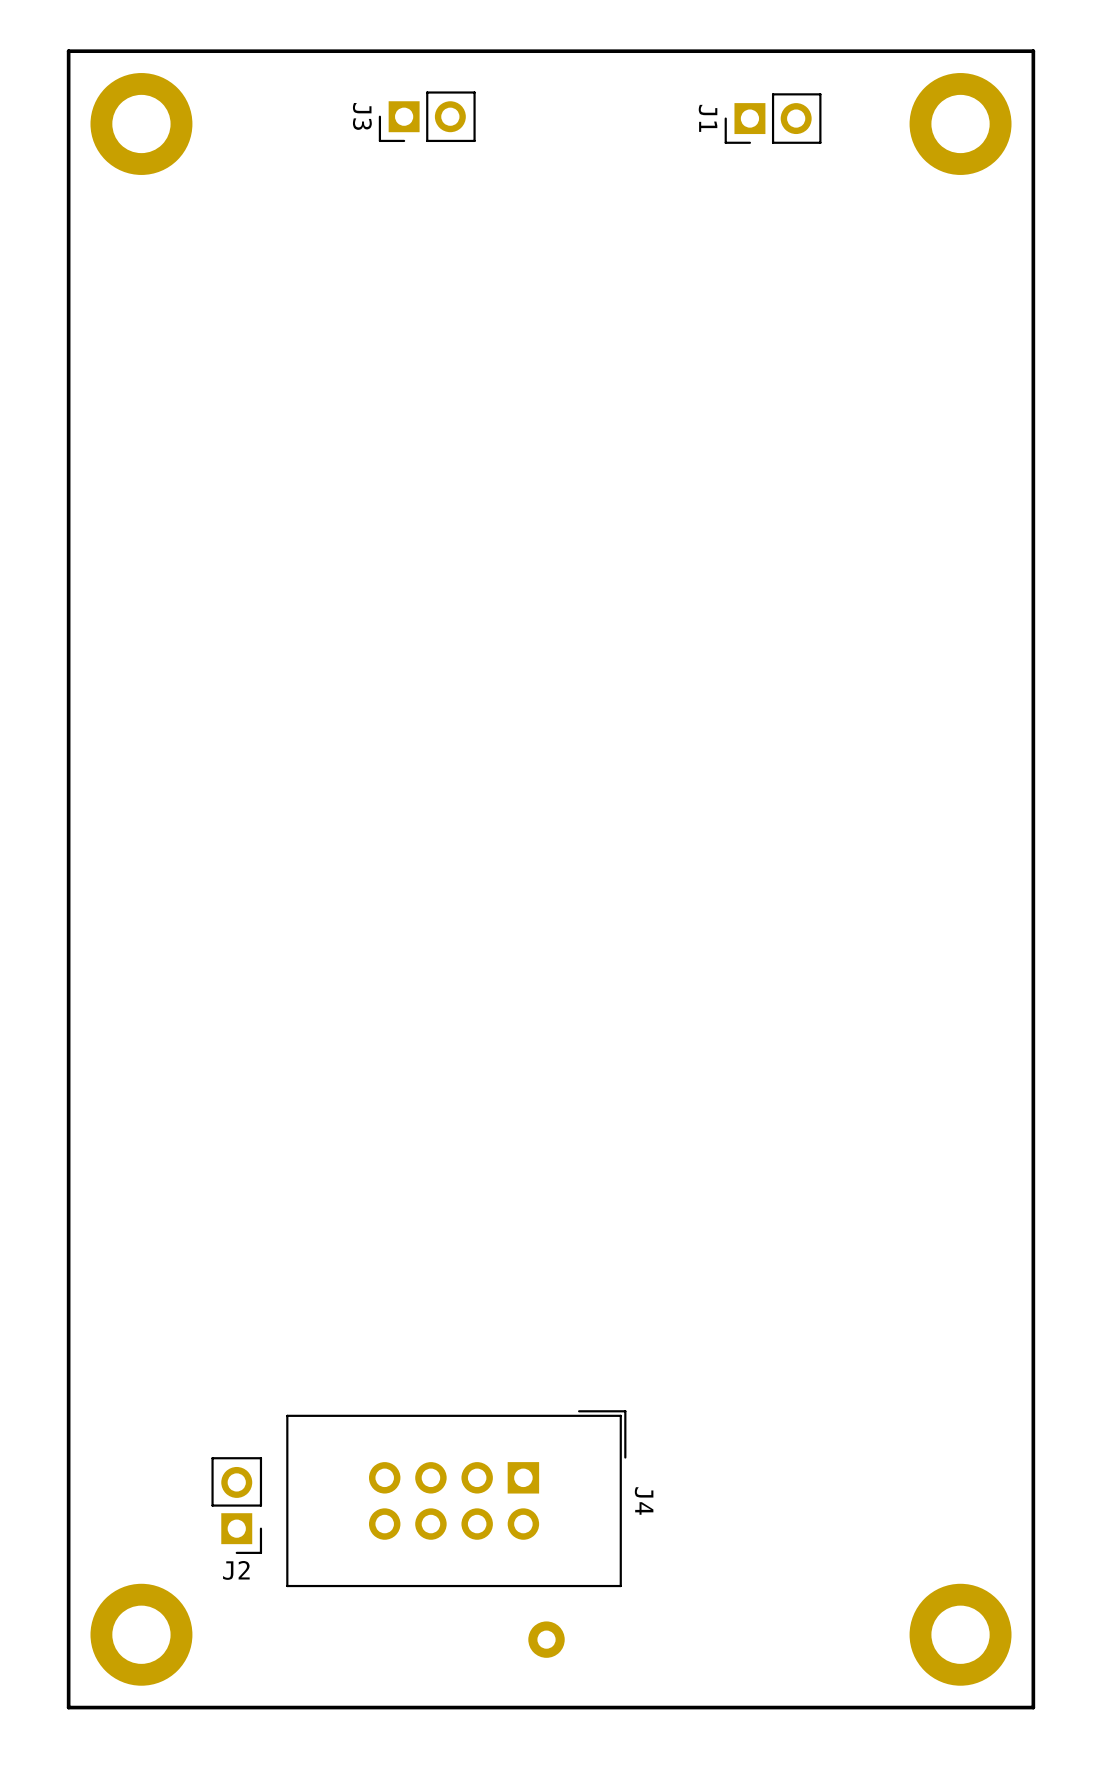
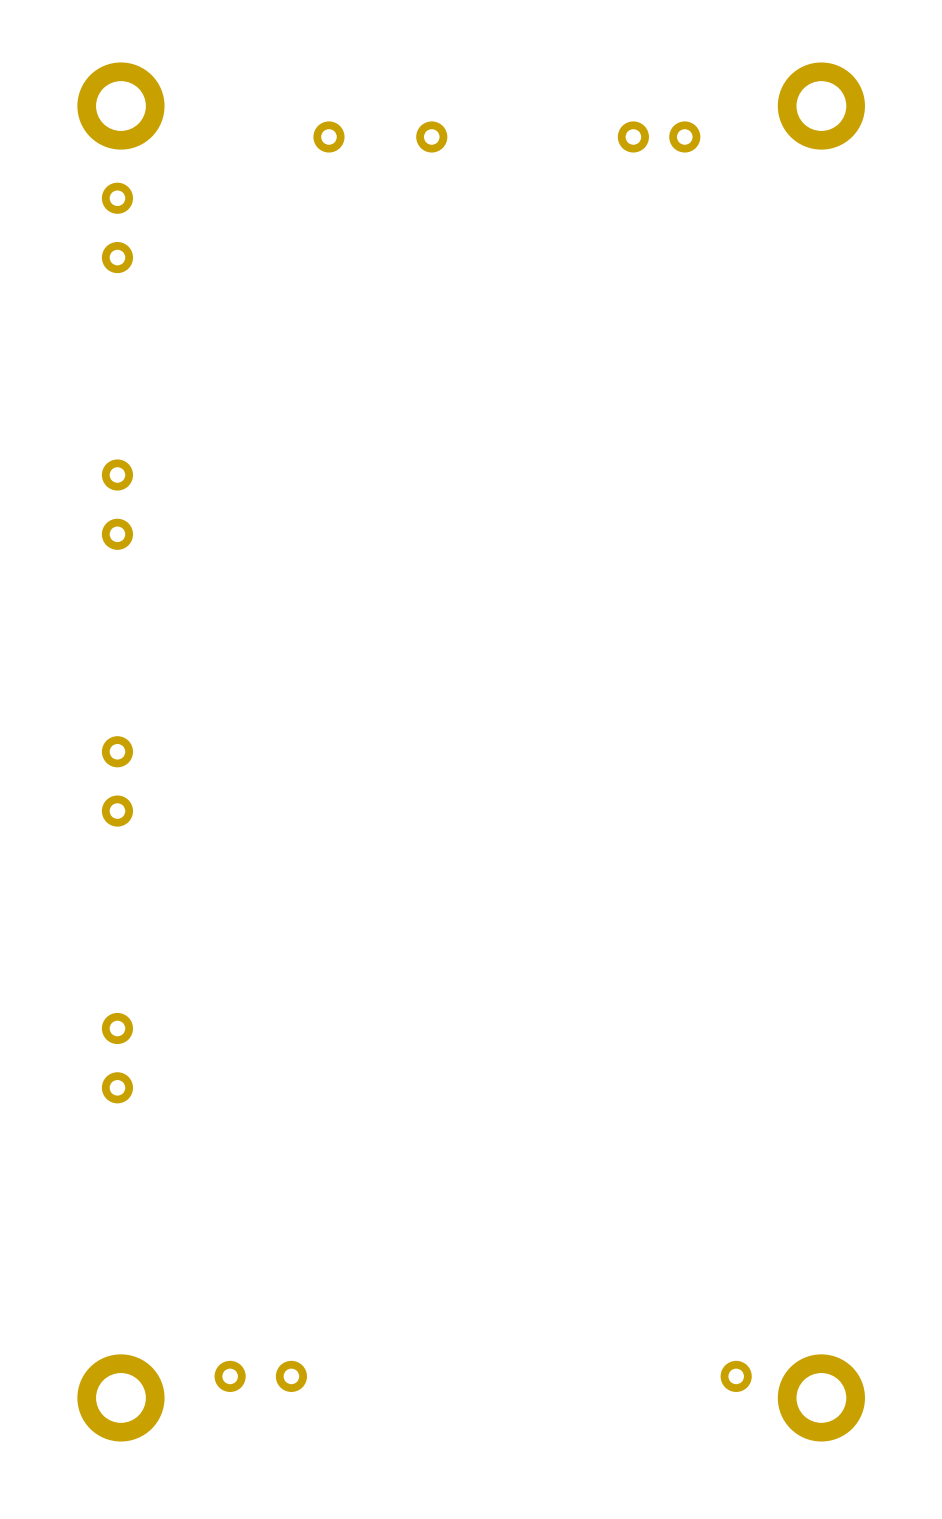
board edge: (1033, 51) (1033, 1707) (68, 1707) (68, 51) (1033, 51) -> none
J3: (427, 116) -> none
J1: (773, 118) -> none
part: none -> (328, 136)
part: none -> (431, 136)
part: none -> (633, 136)
part: none -> (684, 136)
part: none -> (117, 198)
part: none -> (117, 257)
part: none -> (117, 475)
part: none -> (117, 534)
part: none -> (117, 751)
part: none -> (117, 811)
part: none -> (117, 1028)
part: none -> (117, 1087)
J4: (456, 1498) -> none
J2: (236, 1505) -> none
part: none -> (230, 1376)
part: none -> (291, 1376)
part: none -> (736, 1376)
part: (546, 1639) -> none

